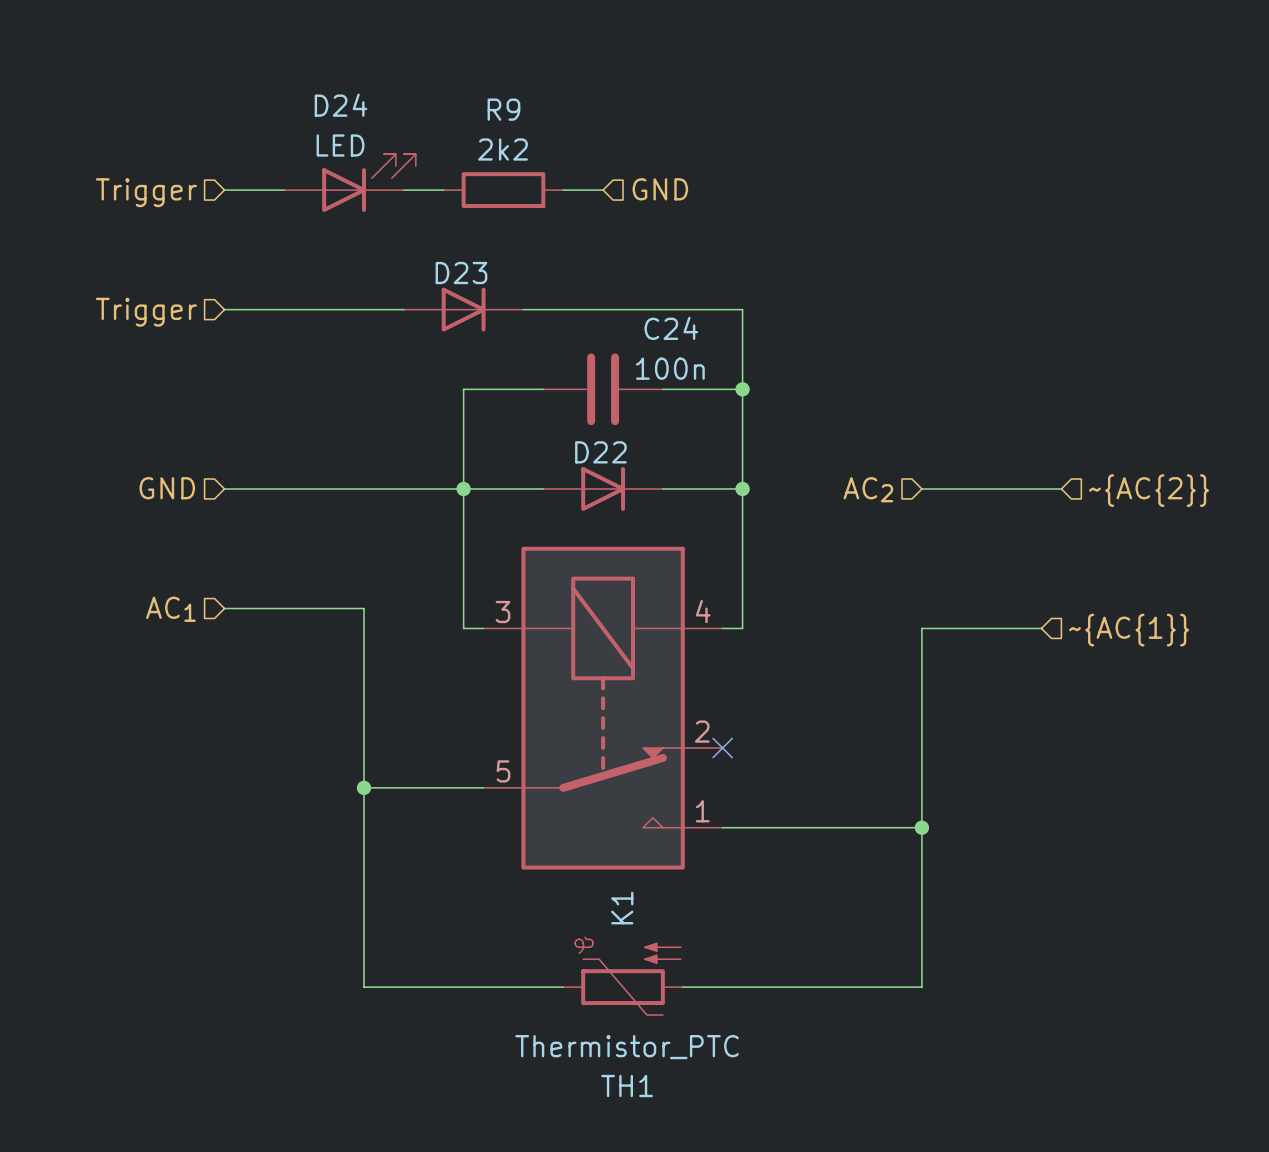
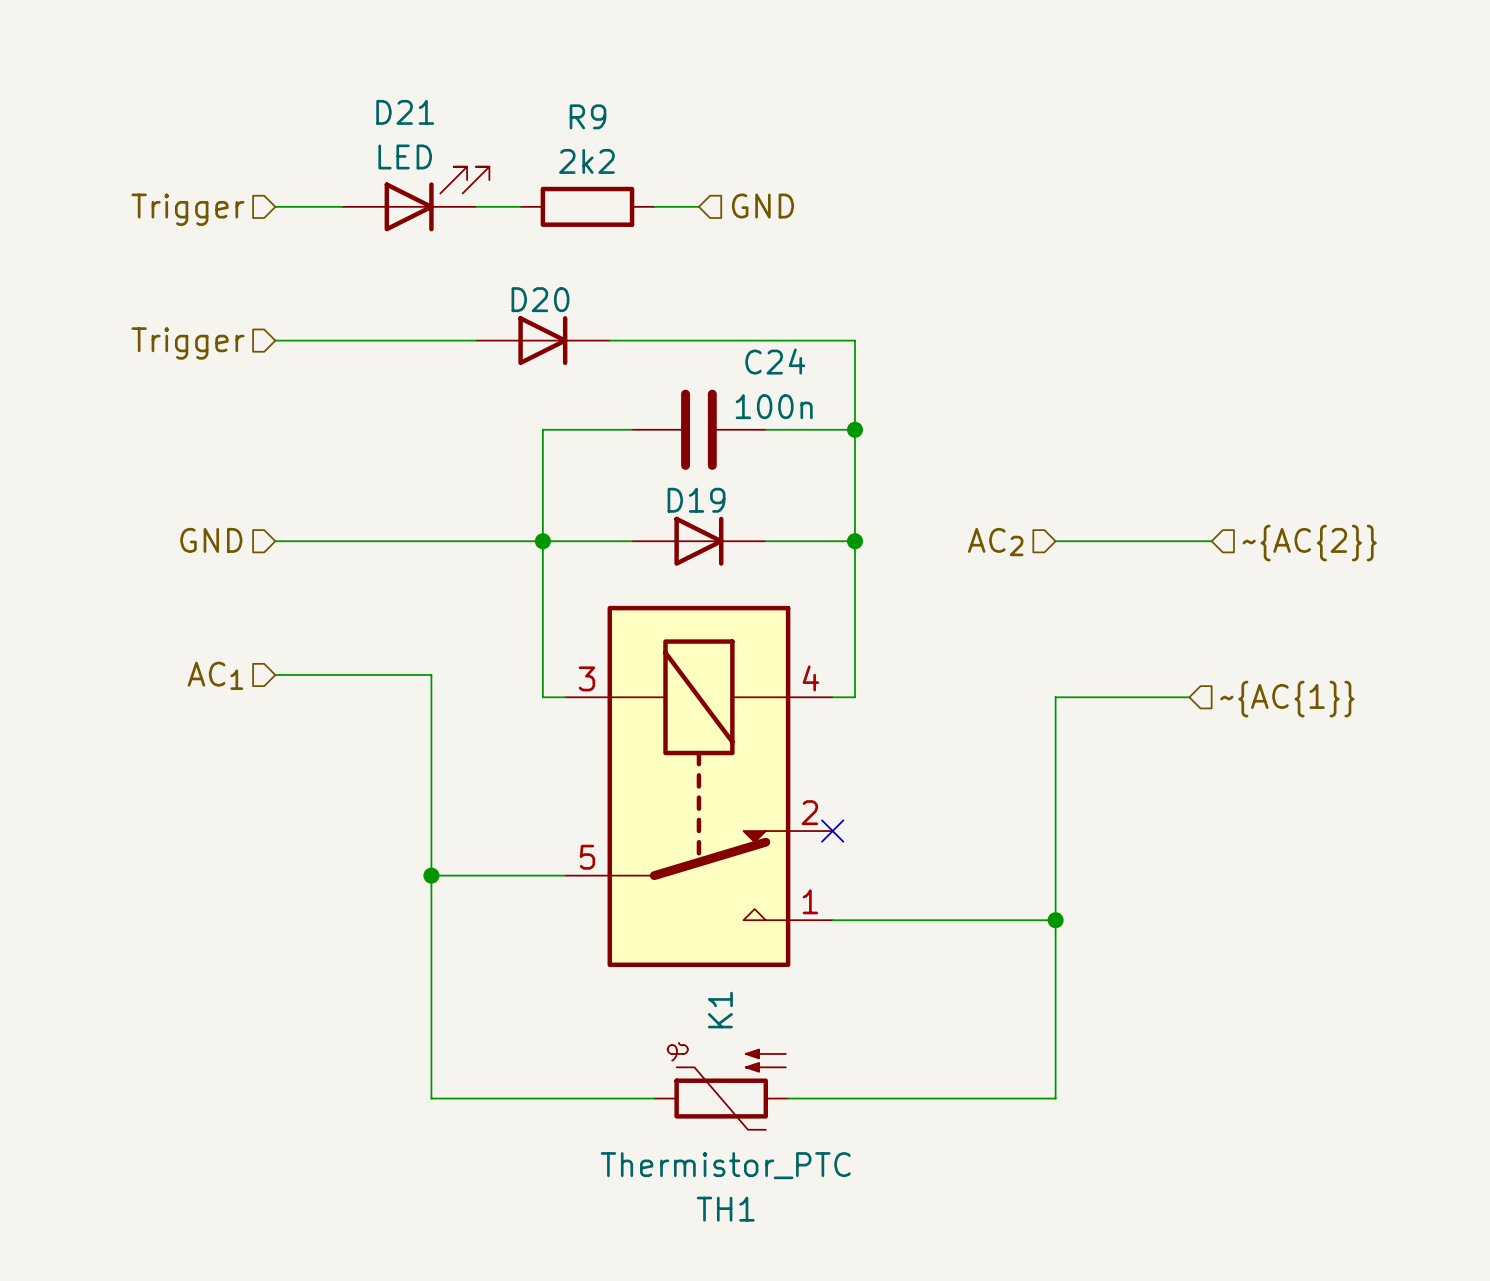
D24 name: D24 (341, 105) -> D21 (405, 112)
D23 name: D23 (461, 273) -> D20 (540, 299)
D22 name: D22 (600, 452) -> D19 (696, 500)

